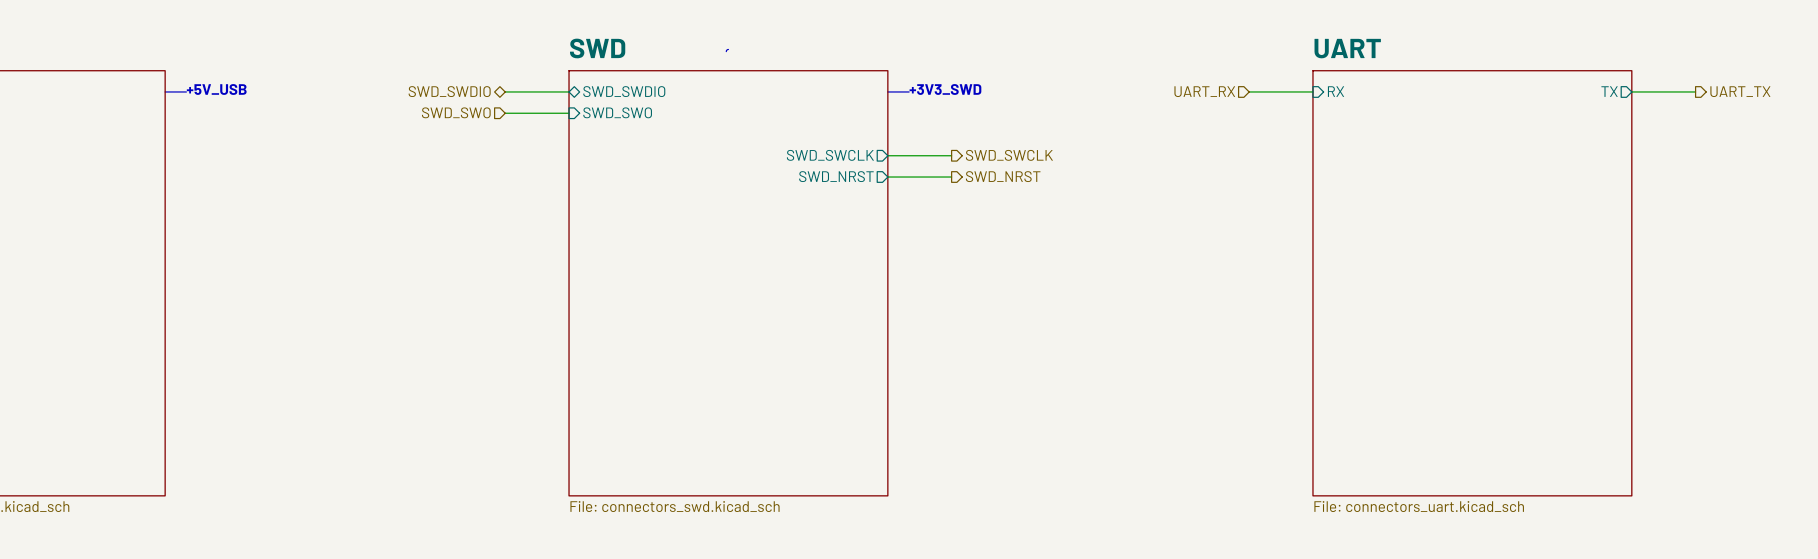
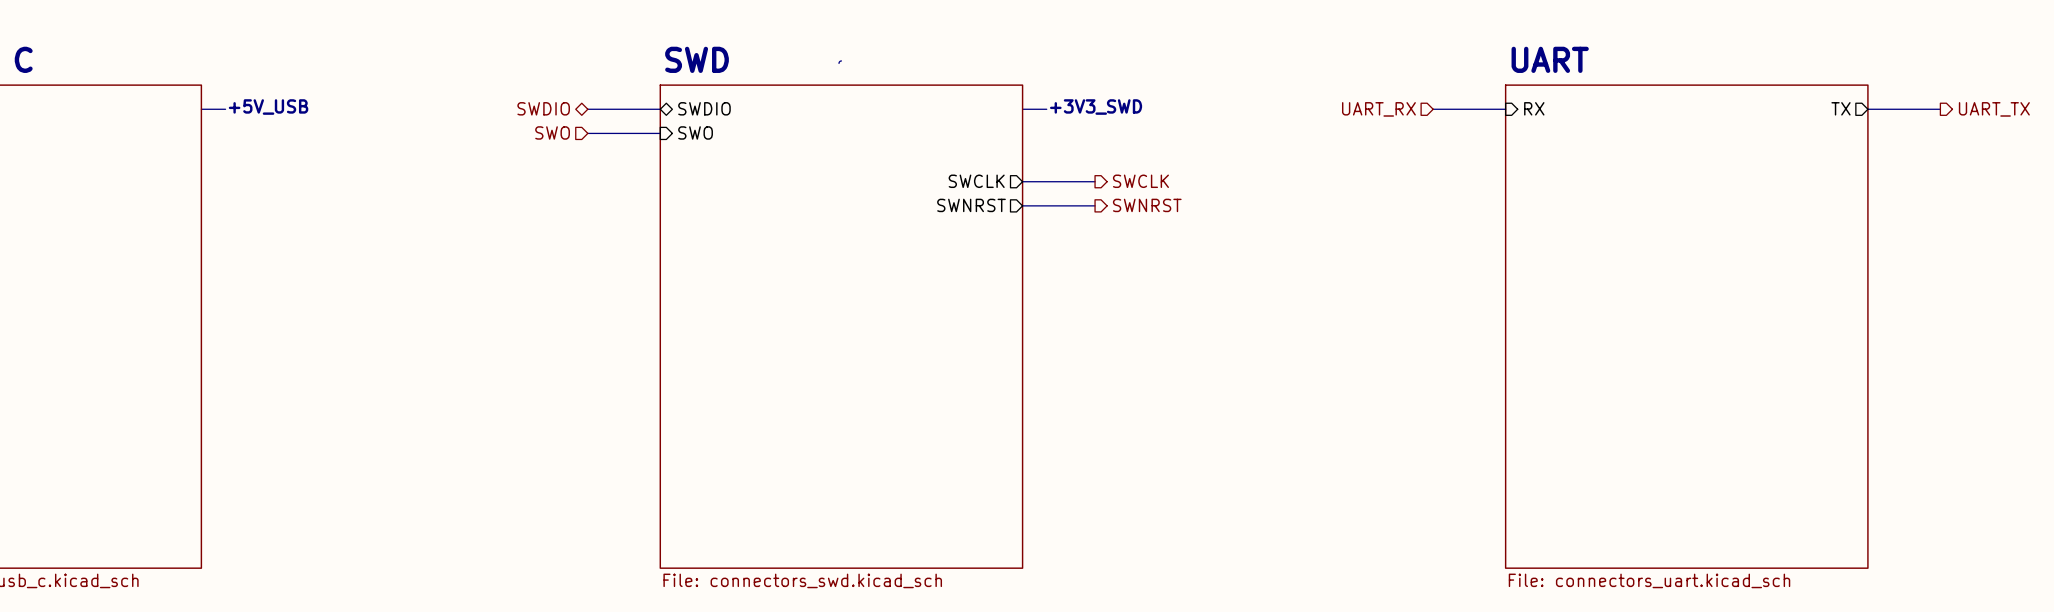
hierarchical label: SWD_SWDIO (449, 91) -> SWDIO (543, 108)
sheet pin: SWD_SWDIO (624, 91) -> SWDIO (704, 108)
hierarchical label: SWD_SWO (456, 112) -> SWO (552, 132)
sheet pin: SWD_SWO (617, 112) -> SWO (695, 132)
sheet pin: SWD_SWCLK (830, 155) -> SWCLK (976, 181)
hierarchical label: SWD_SWCLK (1009, 155) -> SWCLK (1140, 181)
sheet pin: SWD_NRST (836, 176) -> SWNRST (971, 205)
hierarchical label: SWD_NRST (1003, 176) -> SWNRST (1147, 205)

